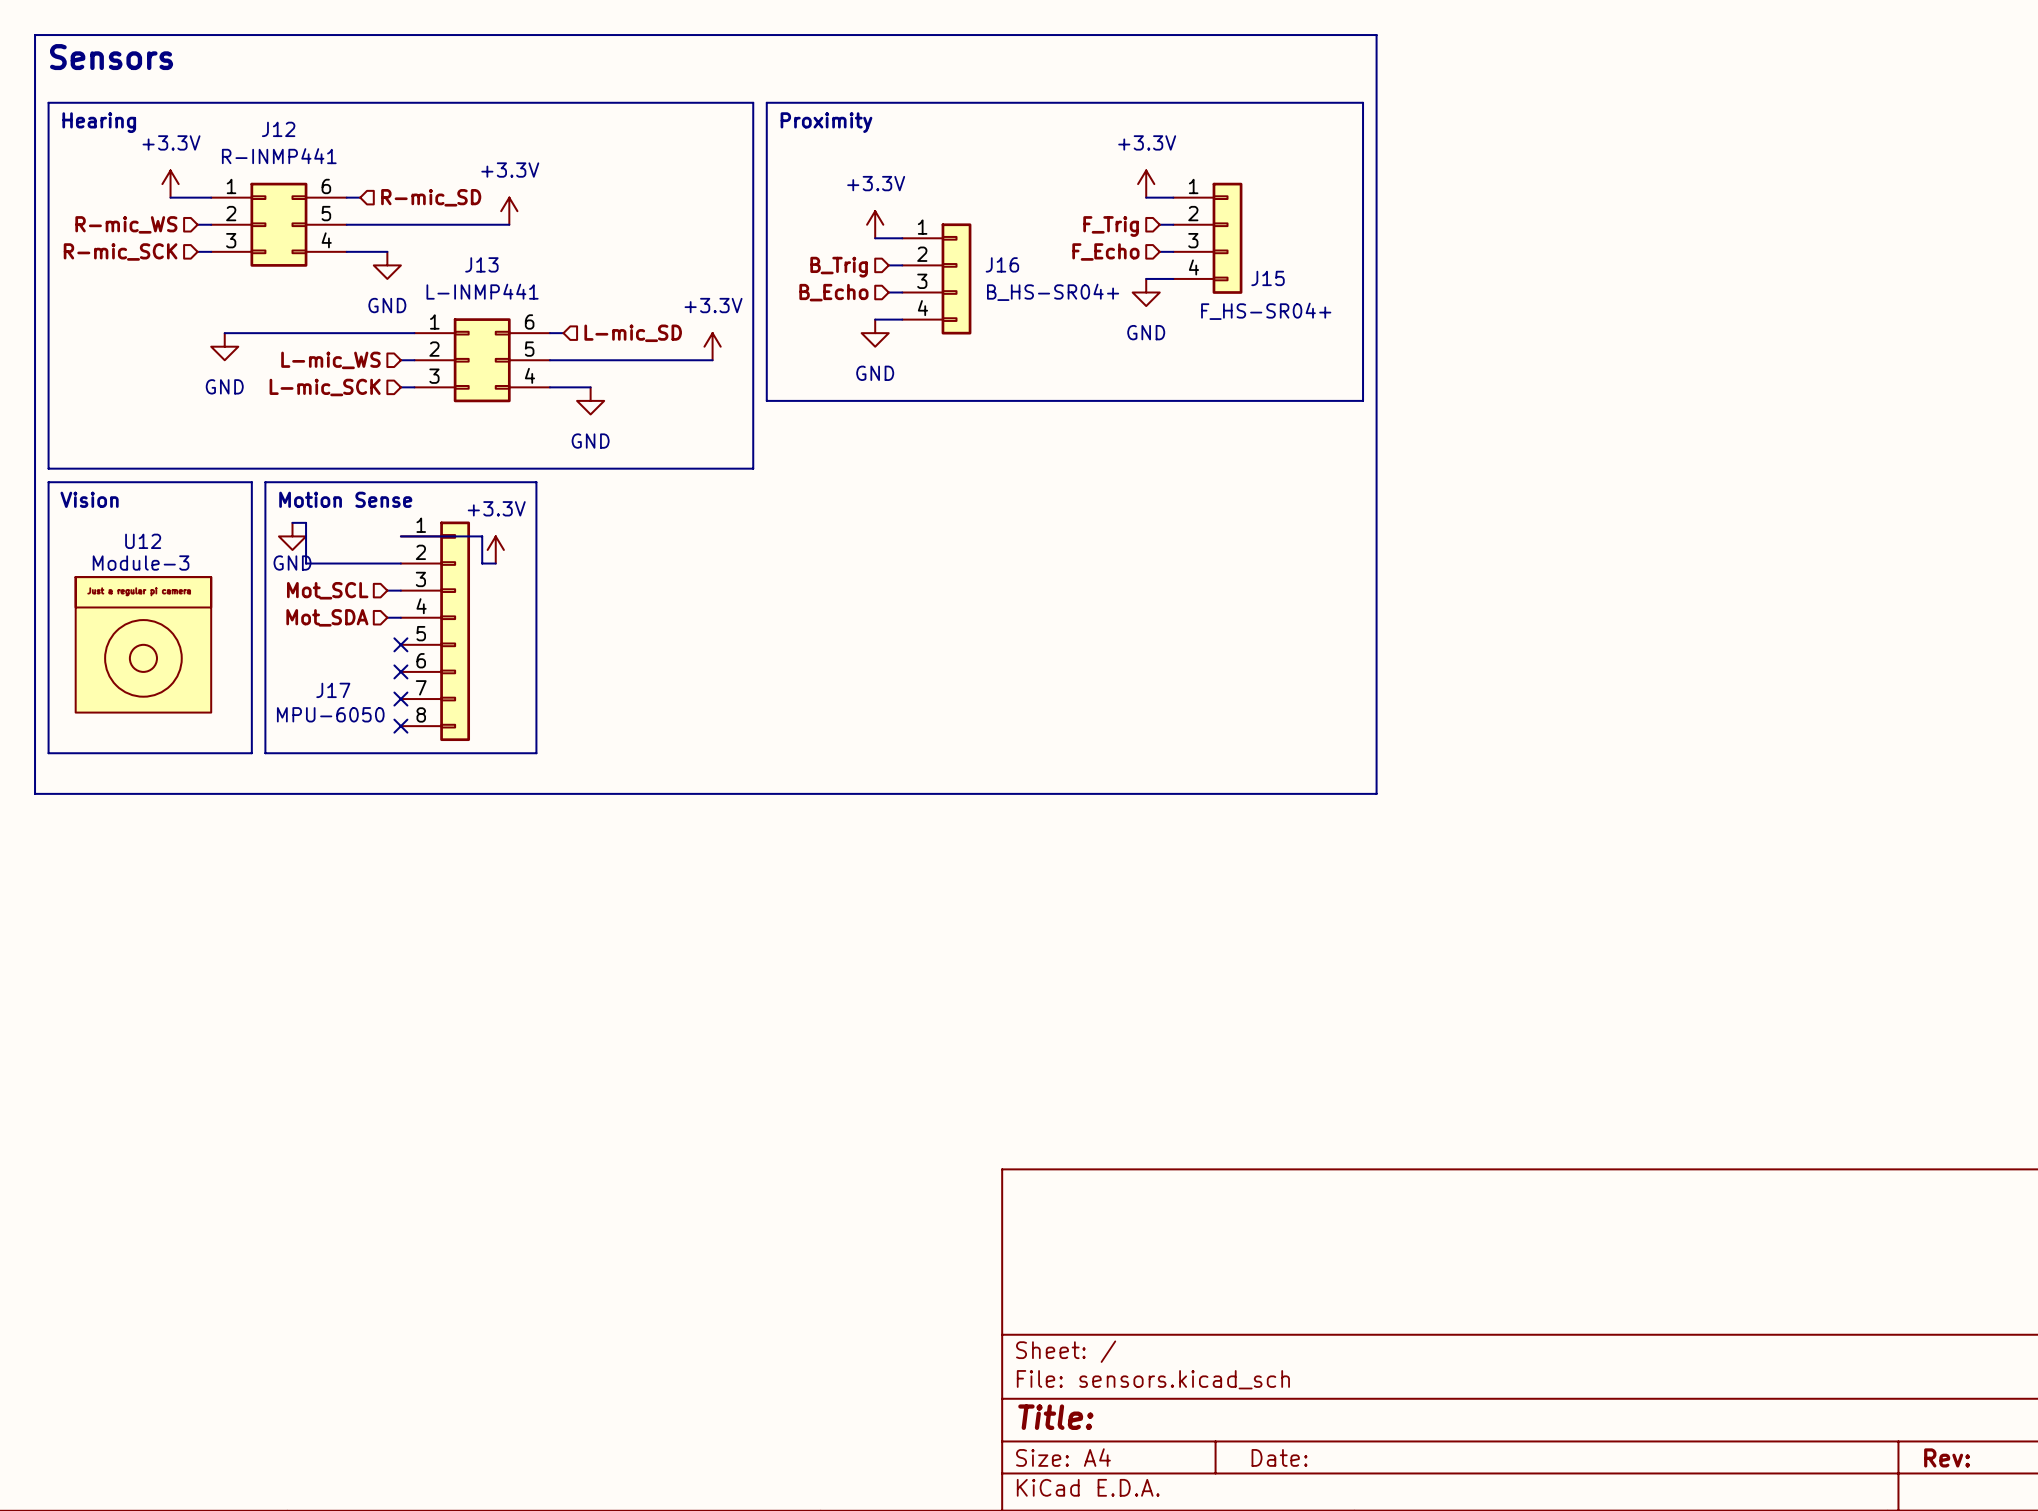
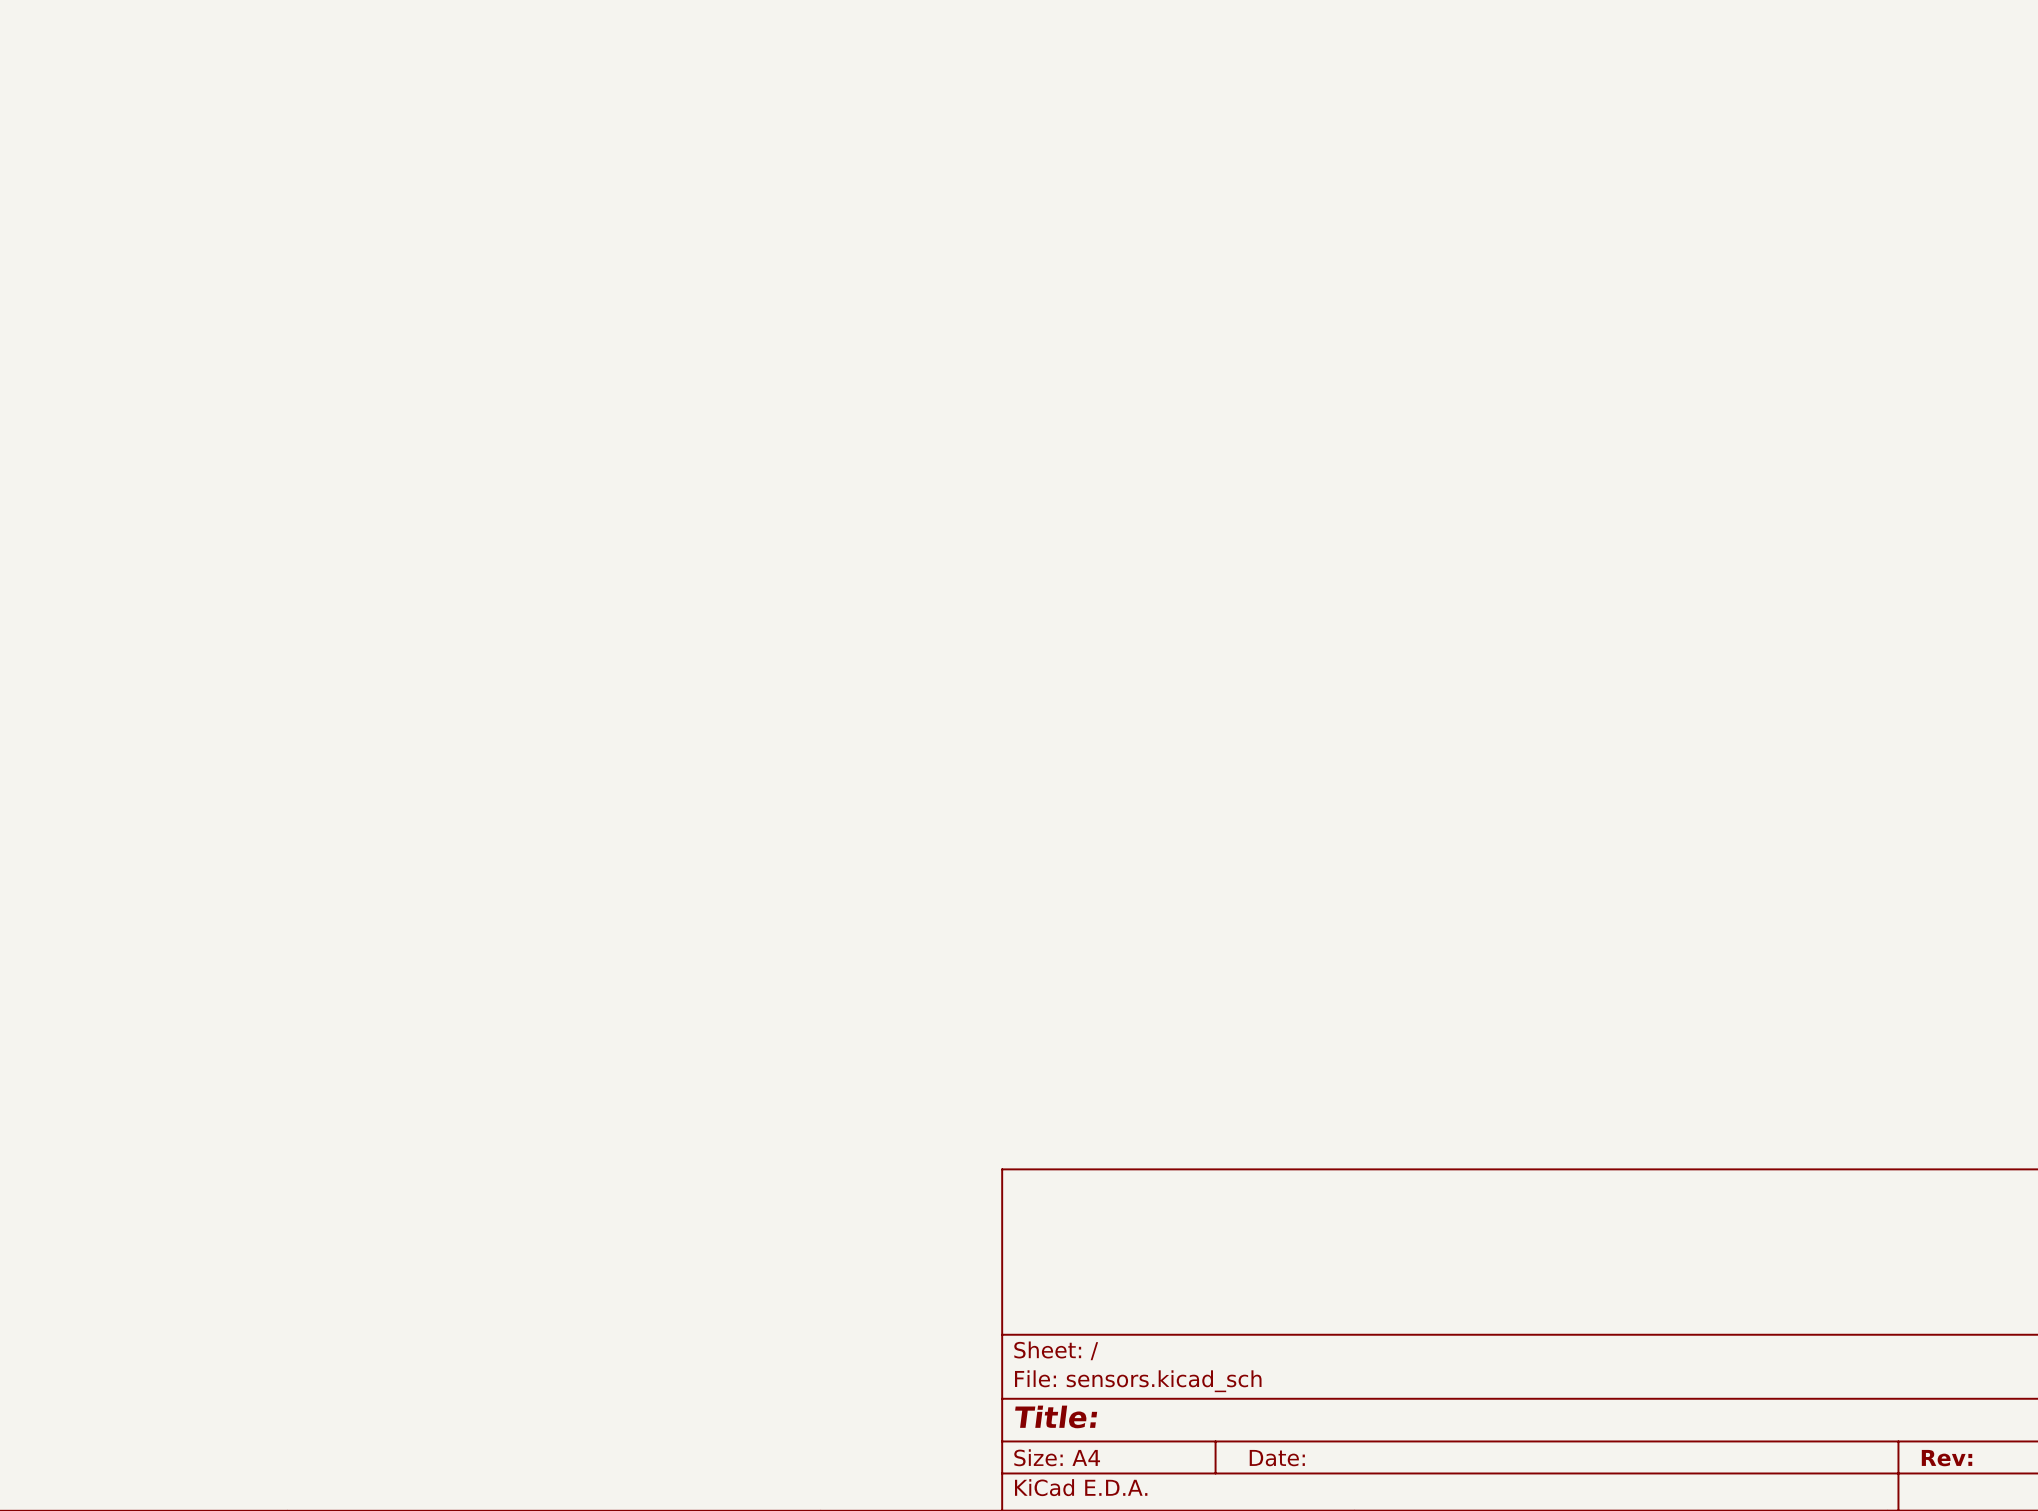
line: (35, 35) (1376, 35) (1376, 793) (35, 793) (35, 35) -> none
text: Sensors (111, 57) -> none
line: (48, 102) (753, 102) (753, 468) (48, 468) (48, 102) -> none
line: (766, 102) (1363, 102) (1363, 400) (766, 400) (766, 102) -> none
text: Hearing (99, 122) -> none
text: Proximity (826, 122) -> none
power symbol: +3.3V (170, 184) -> none
power symbol: +3.3V (1146, 184) -> none
wire: (170, 197) (211, 197) -> none
wire: (346, 197) (360, 197) -> none
hierarchical label: R-mic_SD (431, 197) -> none
wire: (1146, 197) (1173, 197) -> none
power symbol: +3.3V (509, 211) -> none
hierarchical label: R-mic_WS (126, 224) -> none
wire: (197, 224) (211, 224) -> none
J12: R-INMP441 (278, 224) -> none
wire: (346, 224) (509, 224) -> none
power symbol: +3.3V (875, 224) -> none
wire: (1159, 224) (1173, 224) -> none
hierarchical label: F_Trig (1111, 226) -> none
wire: (875, 238) (902, 238) -> none
J15: F_HS-SR04+ (1207, 238) -> none
hierarchical label: R-mic_SCK (120, 251) -> none
wire: (197, 251) (211, 251) -> none
wire: (346, 251) (387, 251) -> none
hierarchical label: F_Echo (1105, 251) -> none
wire: (1159, 251) (1173, 251) -> none
power symbol: GND (387, 265) -> none
wire: (888, 265) (902, 265) -> none
hierarchical label: B_Trig (839, 267) -> none
J16: B_HS-SR04+ (936, 278) -> none
wire: (1146, 278) (1173, 278) -> none
hierarchical label: B_Echo (833, 292) -> none
wire: (888, 292) (902, 292) -> none
power symbol: GND (1146, 292) -> none
wire: (875, 319) (902, 319) -> none
wire: (224, 333) (414, 333) -> none
wire: (549, 333) (563, 333) -> none
hierarchical label: L-mic_SD (633, 333) -> none
power symbol: GND (875, 333) -> none
power symbol: GND (224, 346) -> none
power symbol: +3.3V (712, 346) -> none
hierarchical label: L-mic_WS (330, 360) -> none
wire: (400, 360) (414, 360) -> none
J13: L-INMP441 (482, 360) -> none
wire: (549, 360) (712, 360) -> none
hierarchical label: L-mic_SCK (325, 387) -> none
wire: (400, 387) (414, 387) -> none
wire: (549, 387) (590, 387) -> none
power symbol: GND (590, 400) -> none
line: (48, 482) (251, 482) (251, 753) (48, 753) (48, 482) -> none
line: (265, 482) (536, 482) (536, 753) (265, 753) (265, 482) -> none
text: Vision (89, 499) -> none
text: Motion Sense (345, 499) -> none
wire: (292, 522) (306, 522) (306, 563) (400, 563) -> none
power symbol: GND (292, 536) -> none
wire: (400, 536) (482, 536) (482, 563) (495, 563) -> none
power symbol: +3.3V (495, 549) -> none
hierarchical label: Mot_SCL (327, 590) -> none
wire: (387, 590) (400, 590) -> none
hierarchical label: Mot_SDA (327, 617) -> none
wire: (387, 617) (400, 617) -> none
J17: MPU-6050 (435, 631) -> none
U12: Module-3 (143, 644) -> none
no-connect mark: (400, 644) -> none
no-connect mark: (400, 671) -> none
no-connect mark: (400, 699) -> none
no-connect mark: (400, 726) -> none

